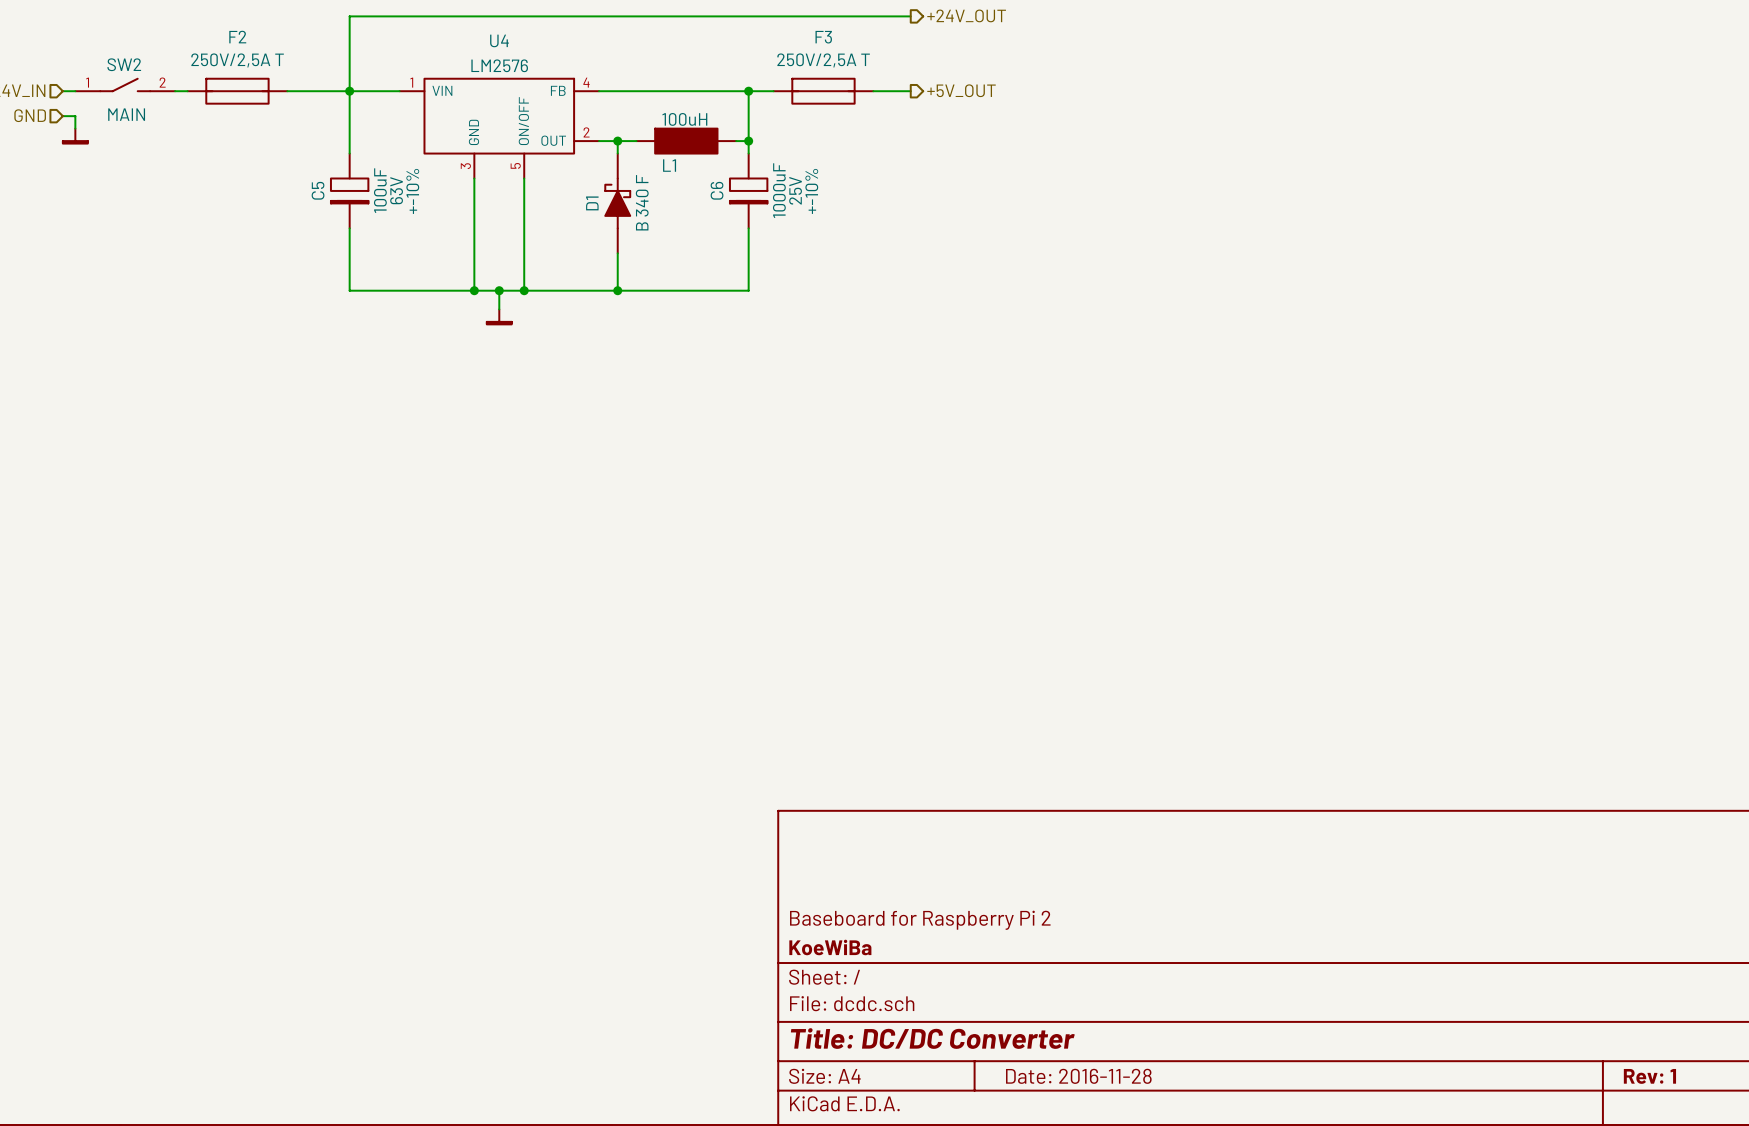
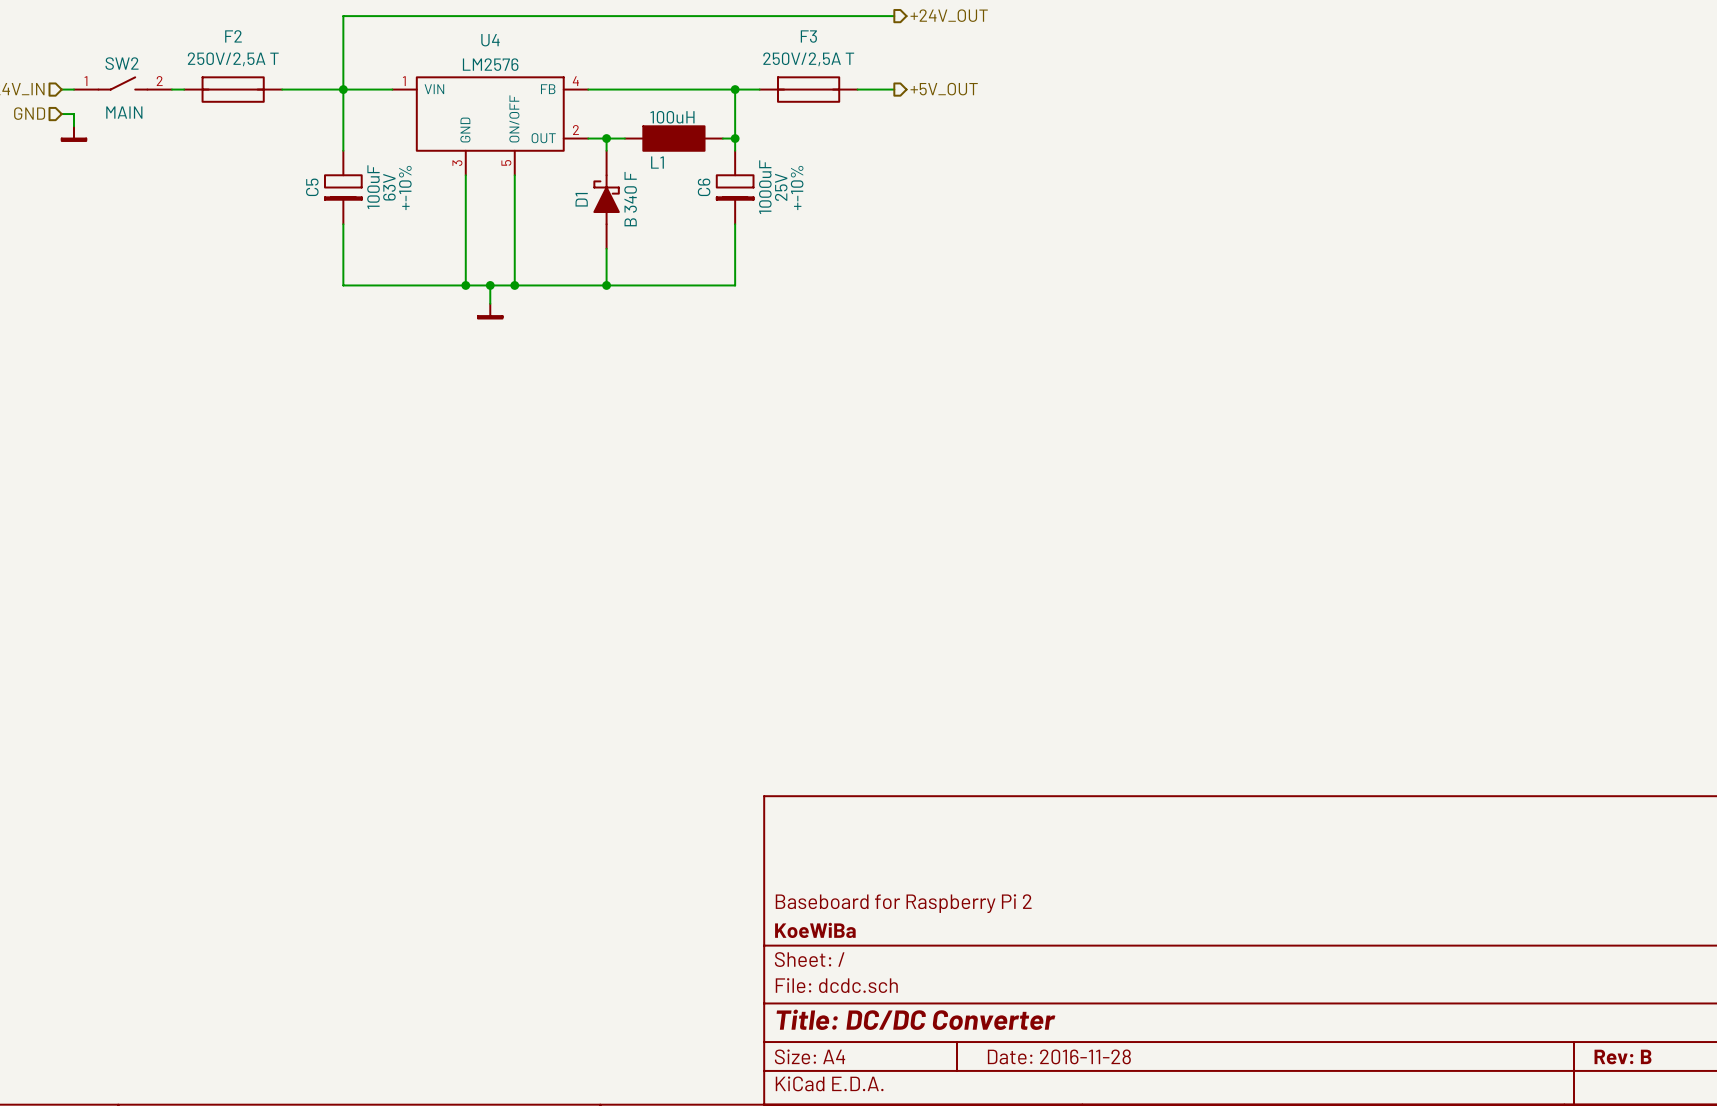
title block: Rev: 1 (1649, 1076) -> Rev: B (1622, 1056)

